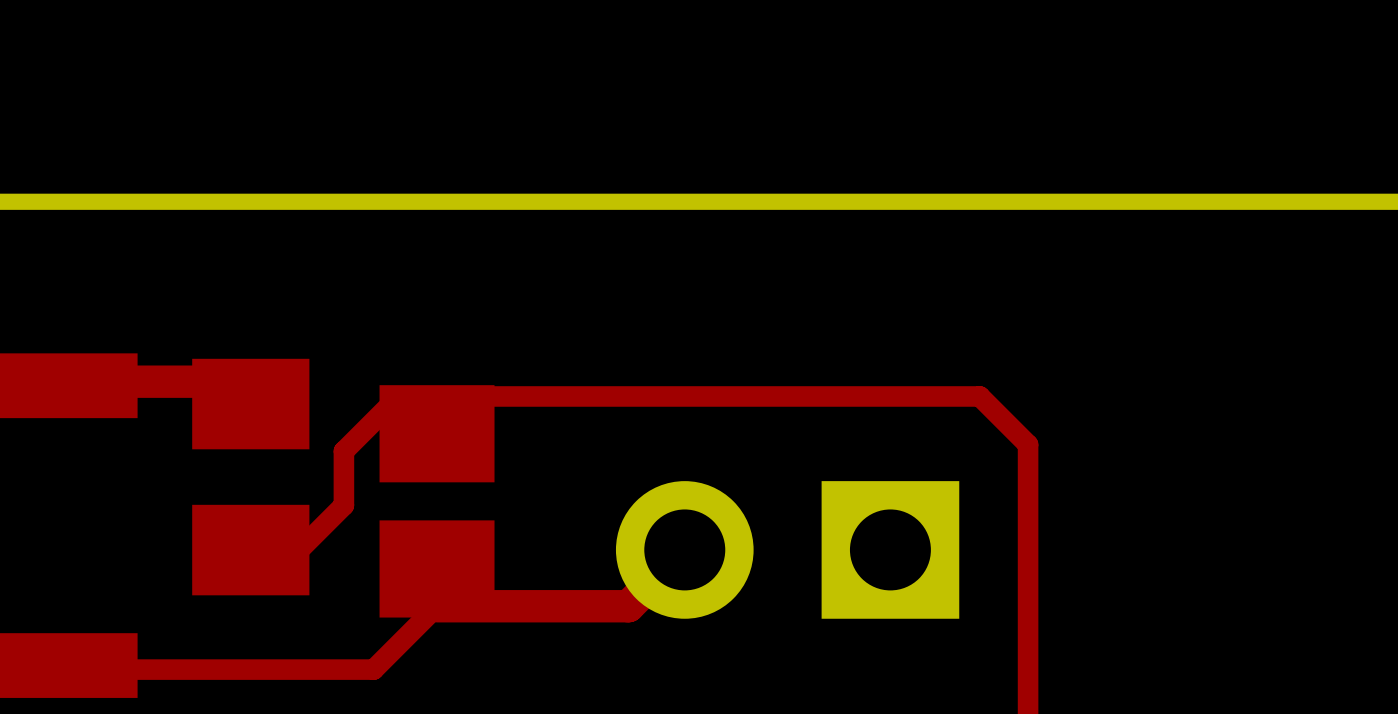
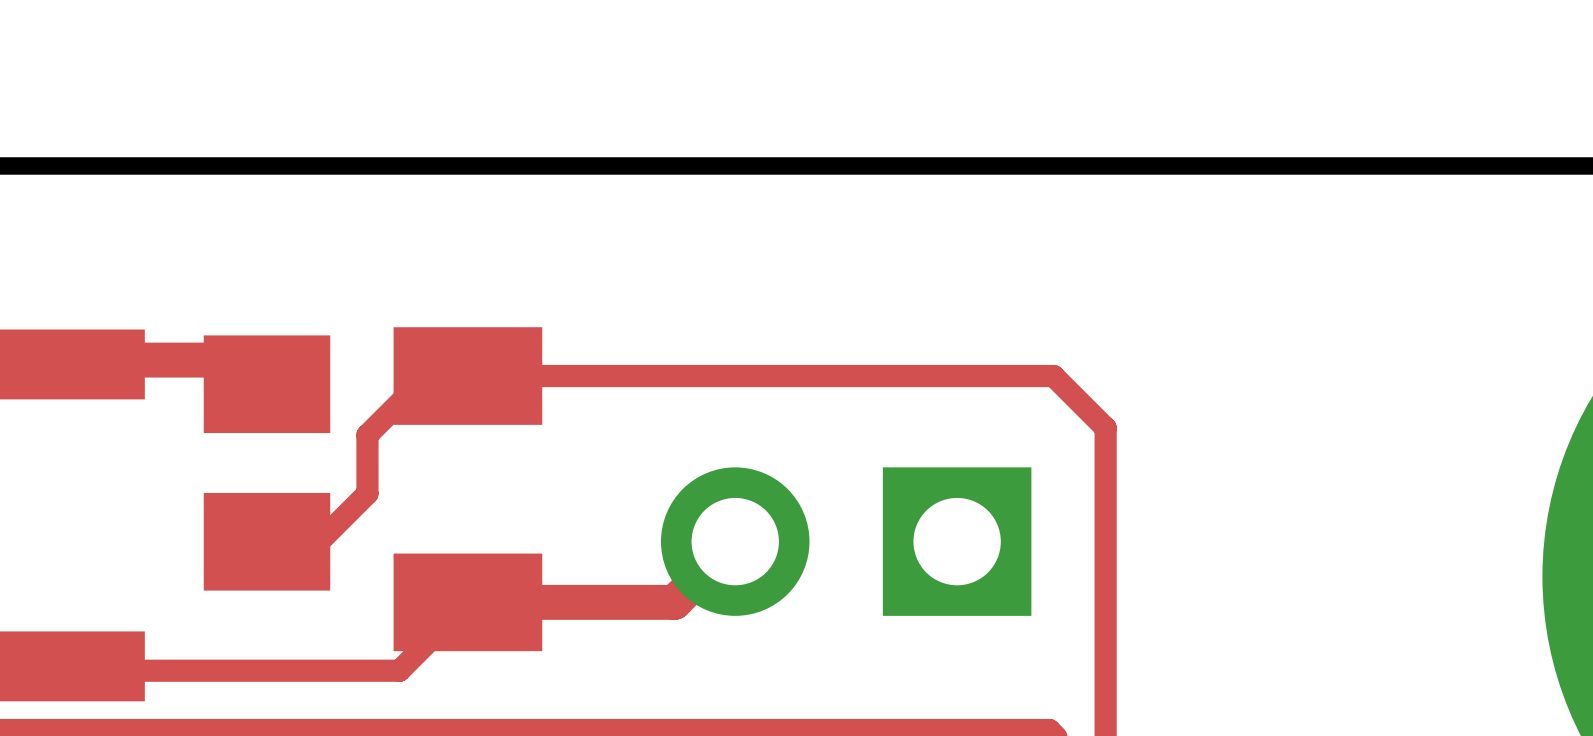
part footprint: [379, 385, 495, 618] -> [393, 327, 543, 652]

